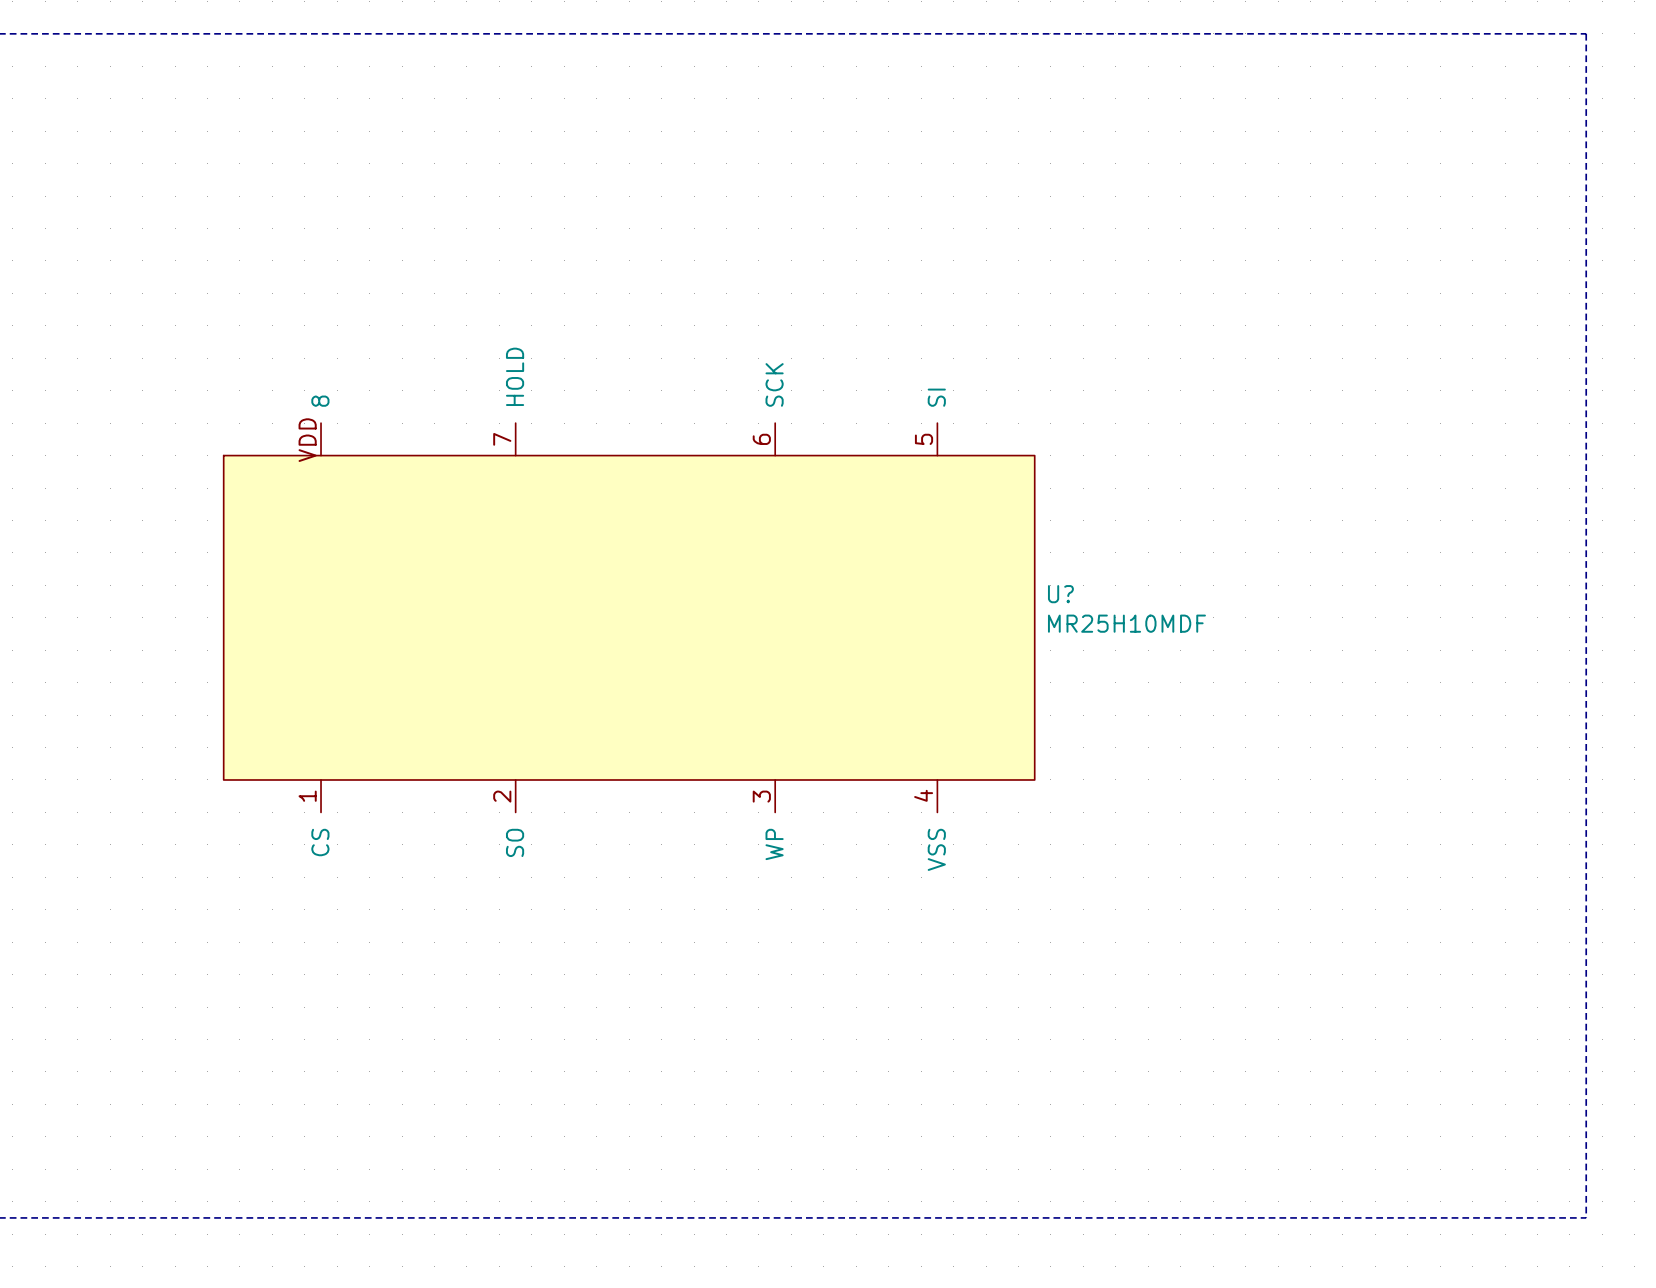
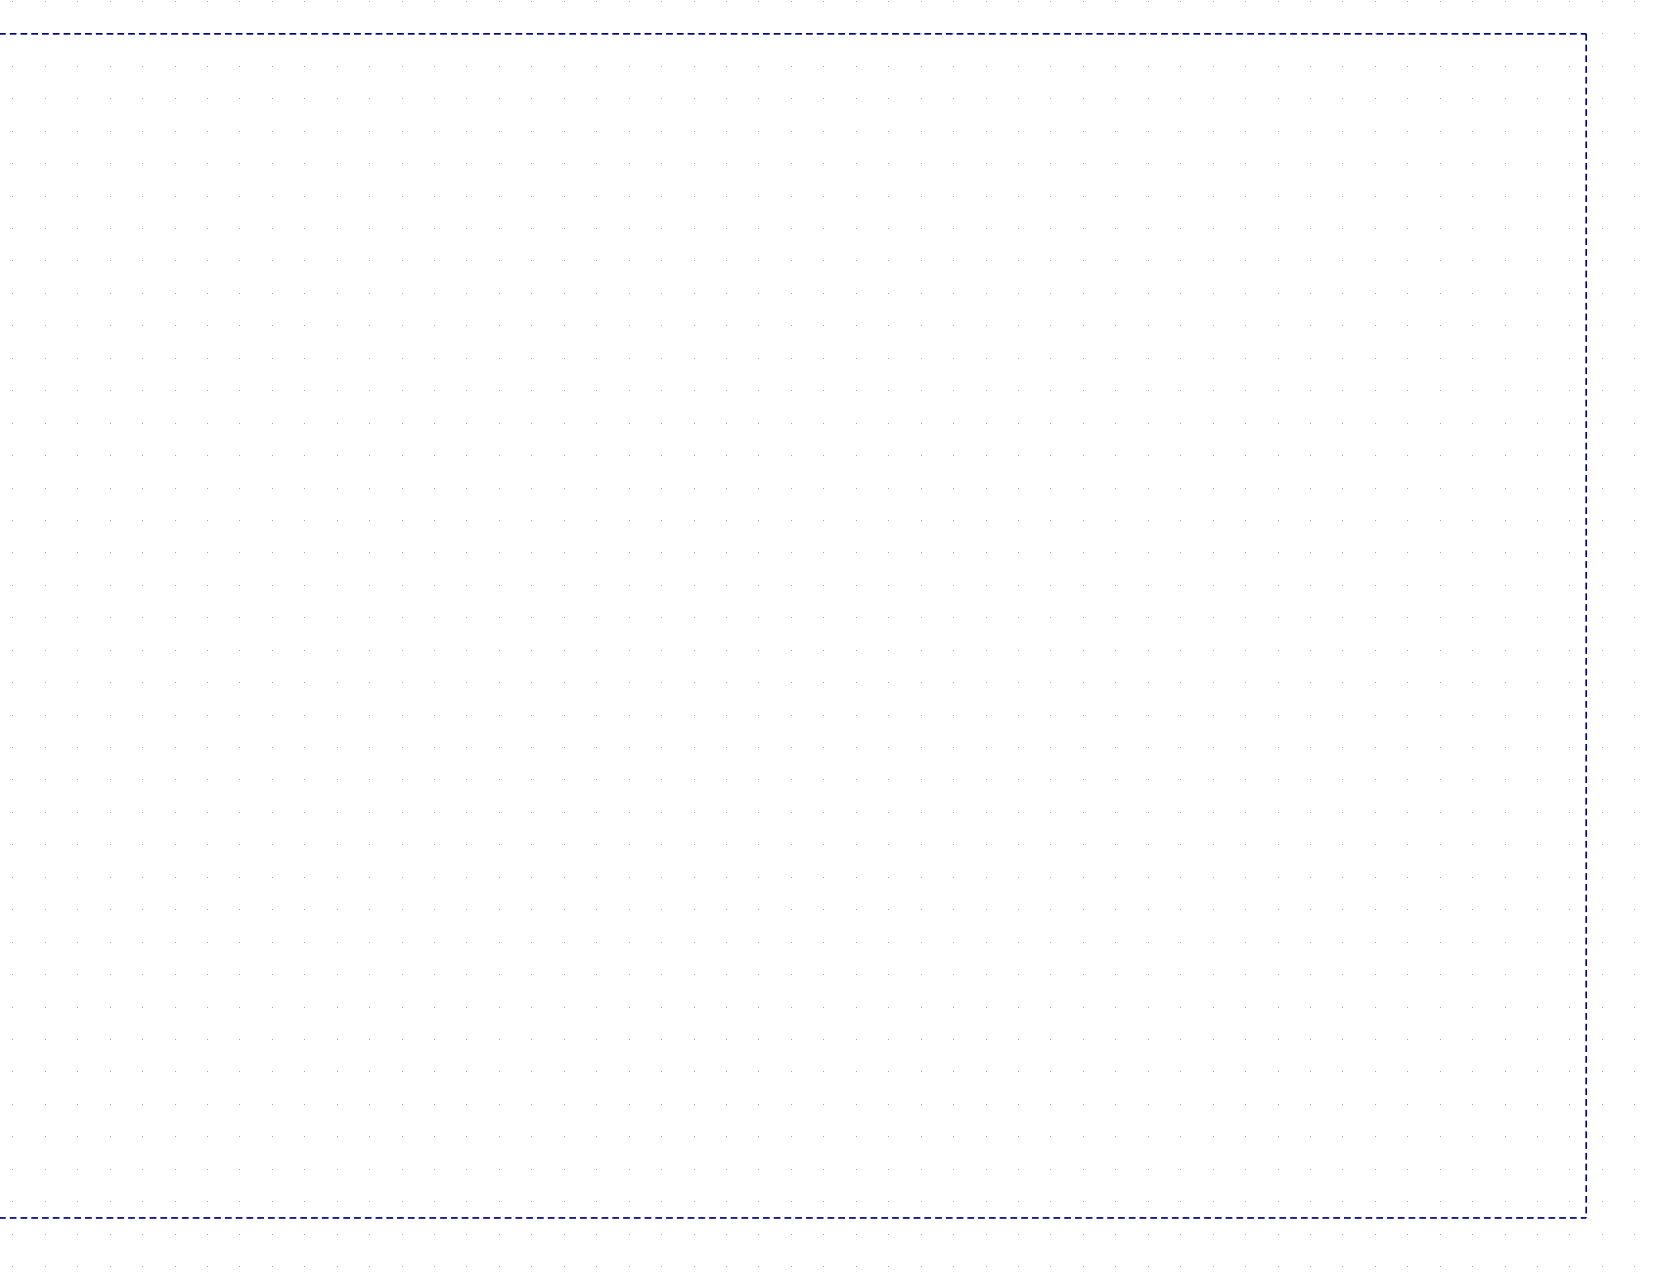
U?: MR25H10MDF (629, 617) -> none

